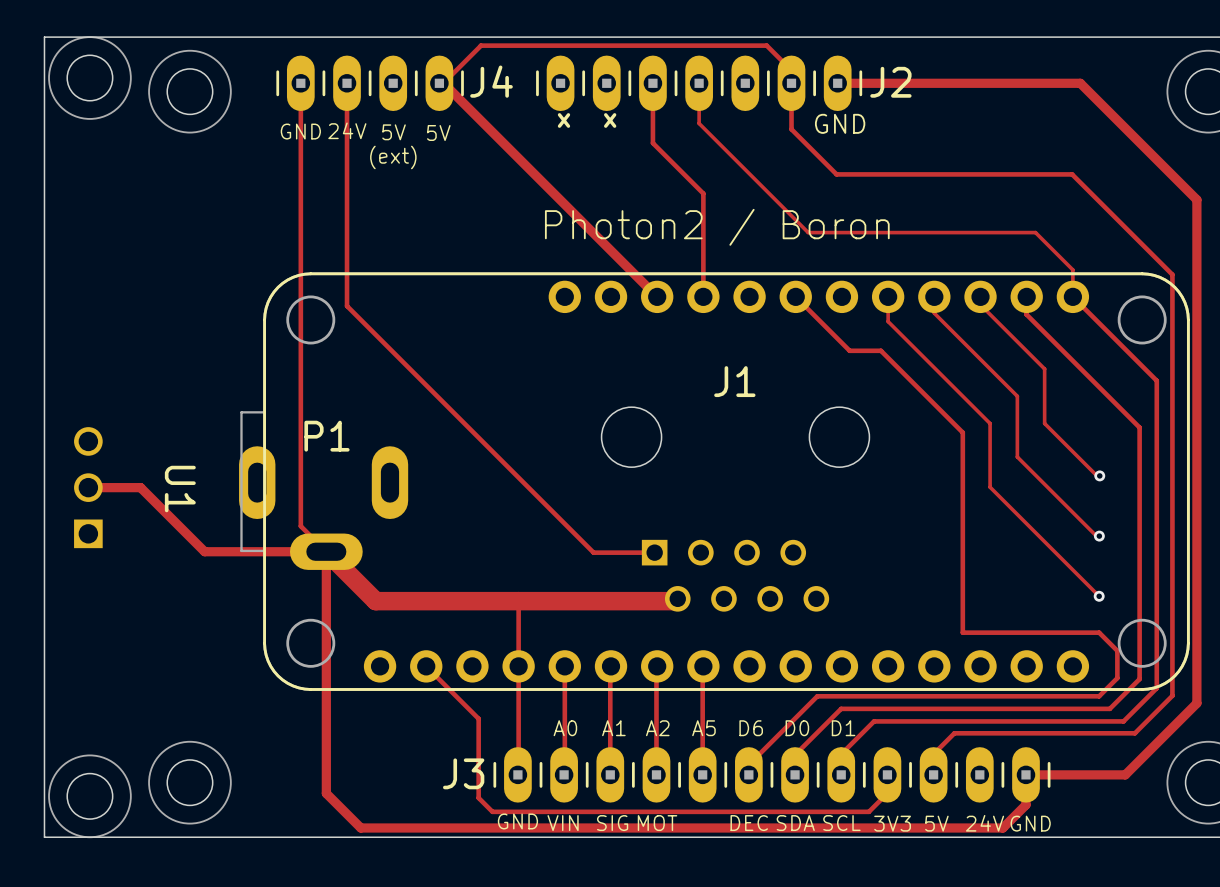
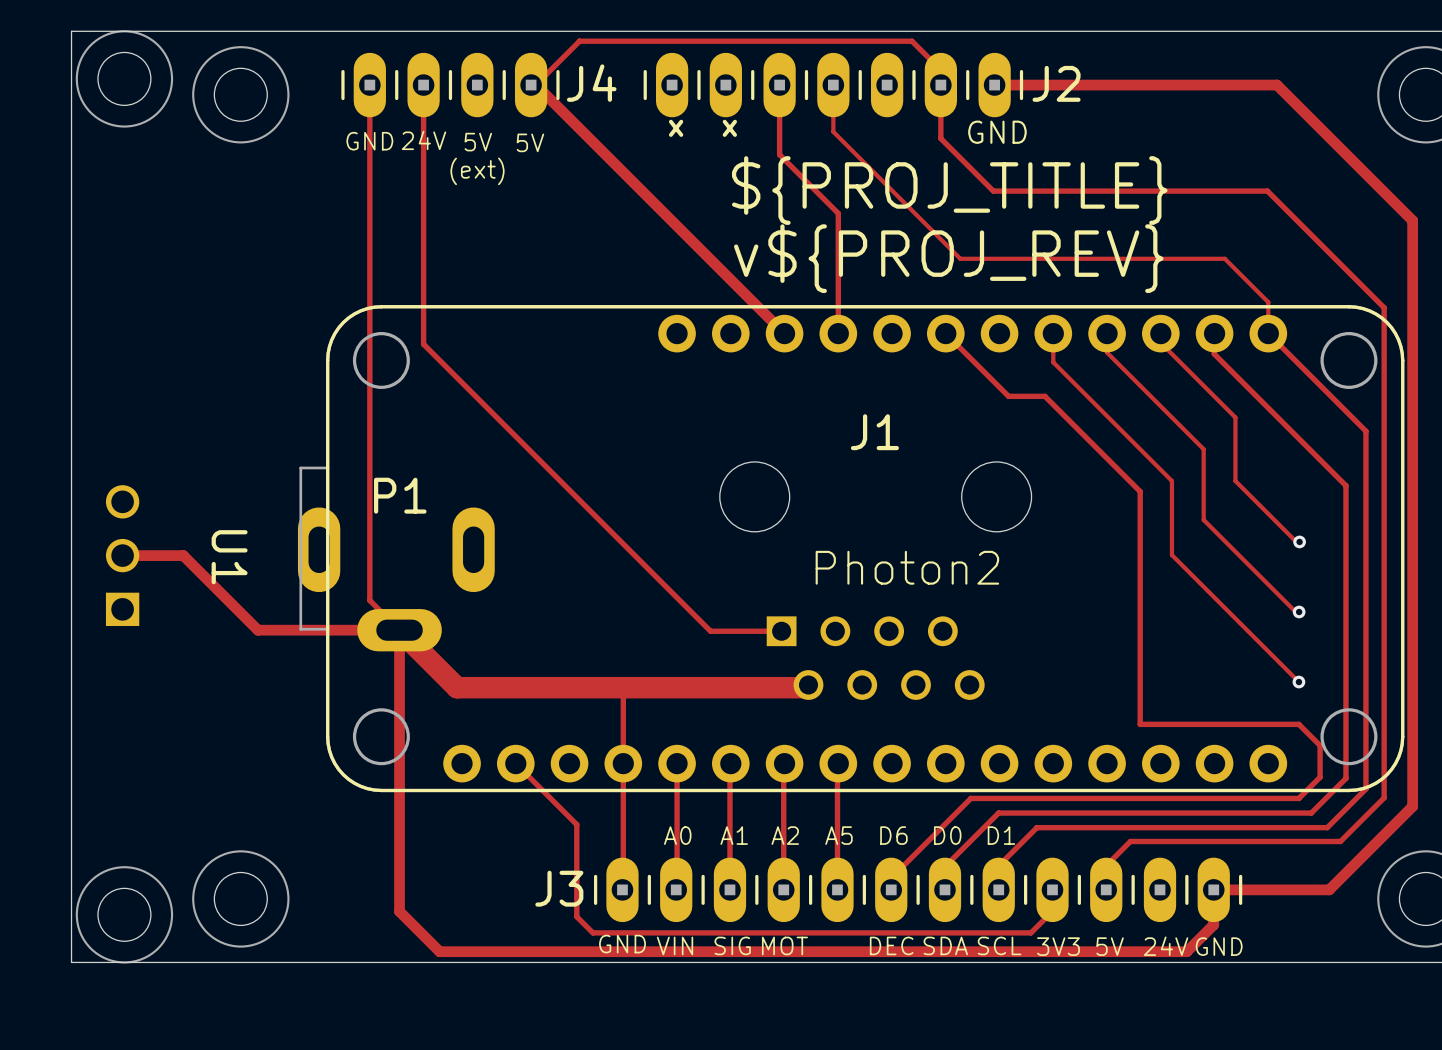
text: none -> ${PROJ_TITLE} (949, 190)
text: Photon2 / Boron (717, 227) -> none
text: none -> v${PROJ_REV} (948, 258)
text: none -> Photon2 (907, 567)

